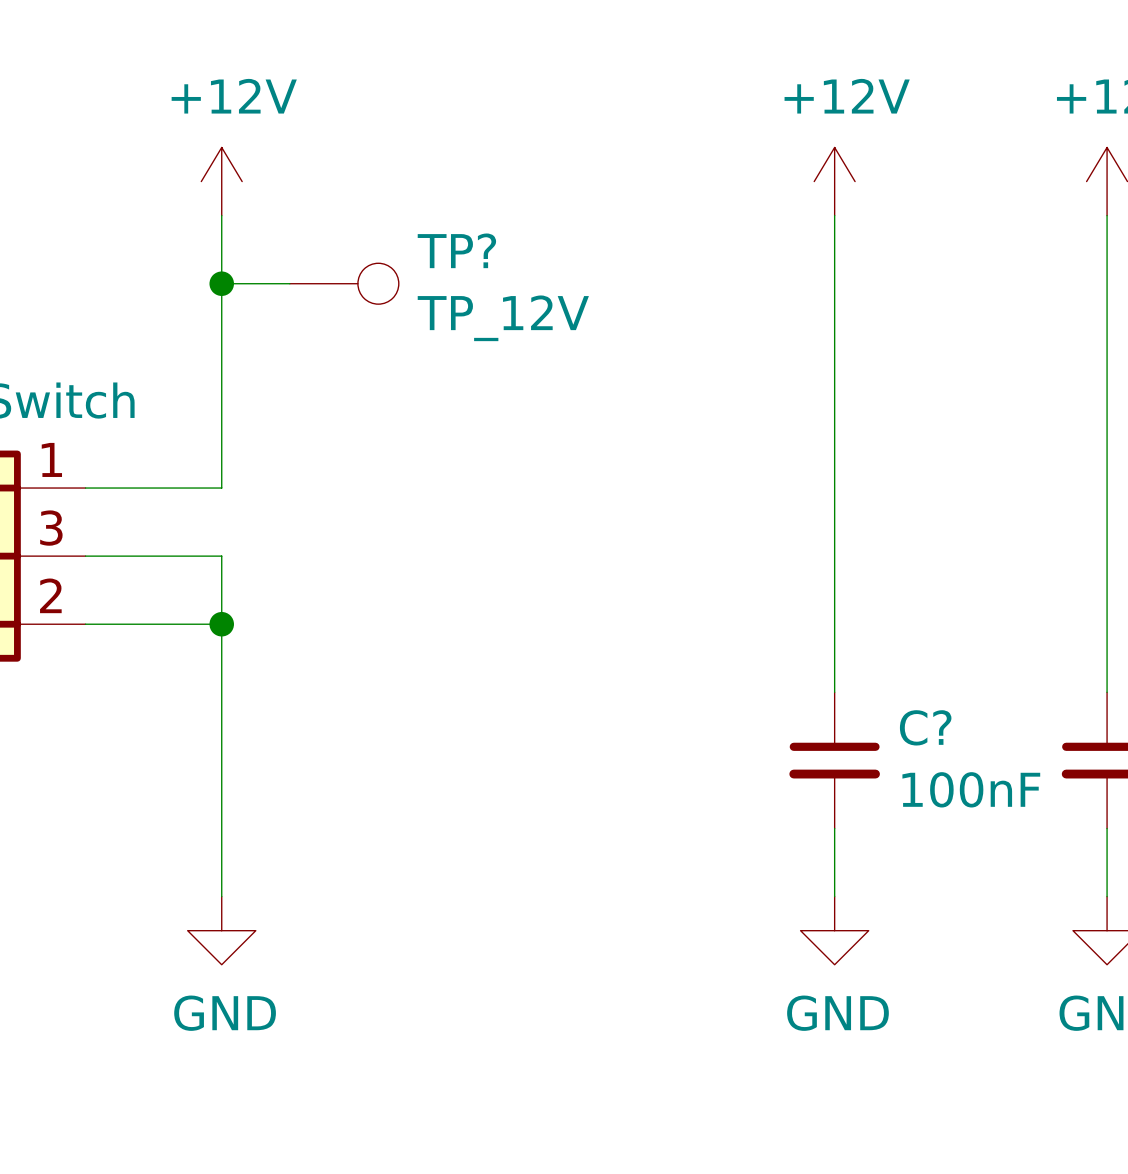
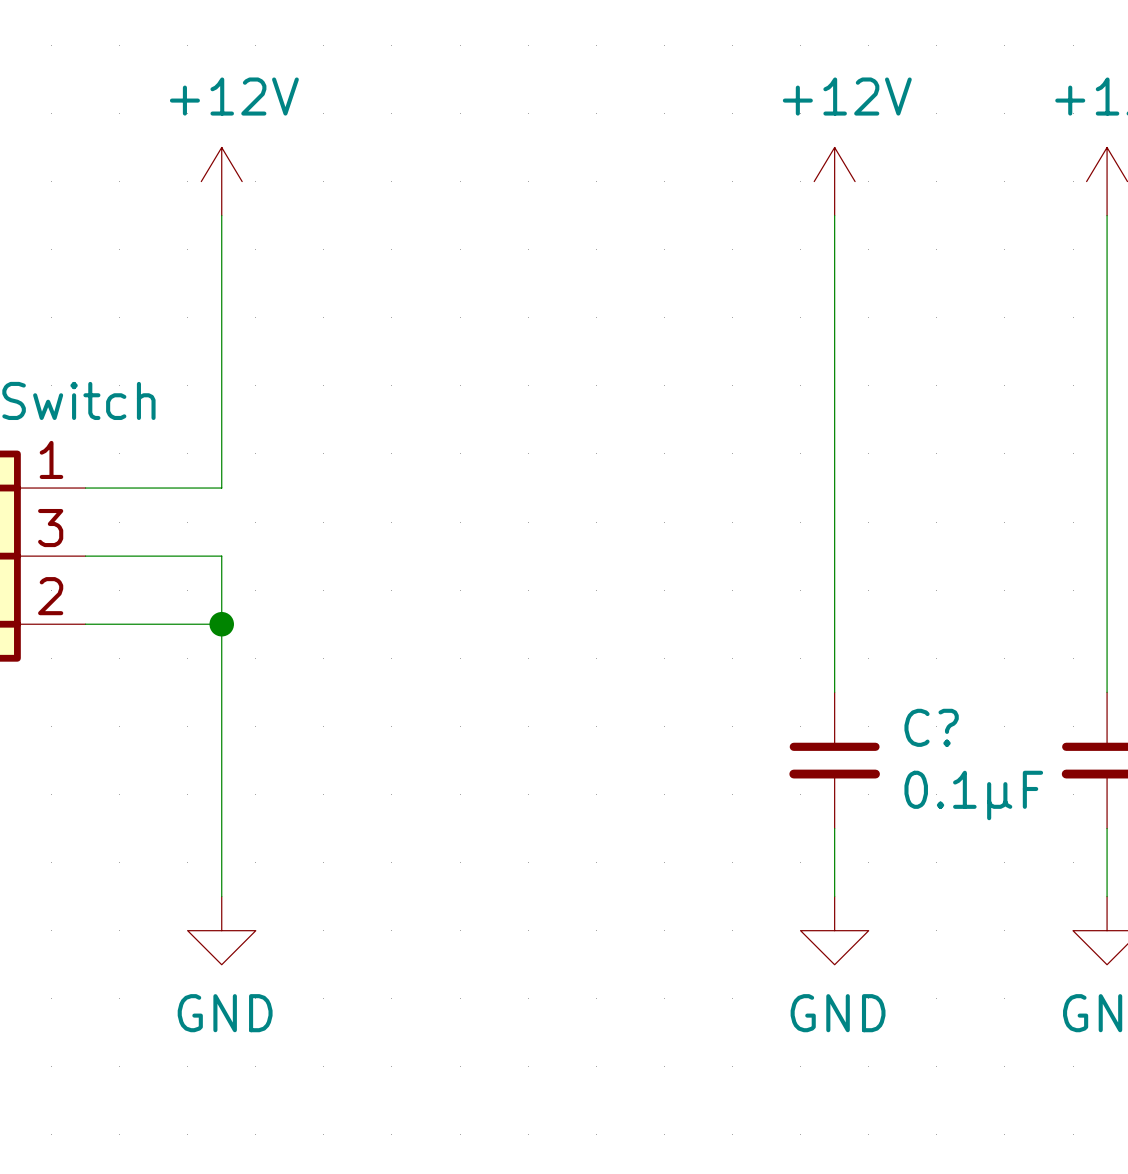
wire: (221, 283) (289, 283) -> none
junction: (221, 283) -> none
TP?: TP_12V (344, 283) -> none
C? value: 100nF (971, 789) -> 0.1μF (973, 795)

